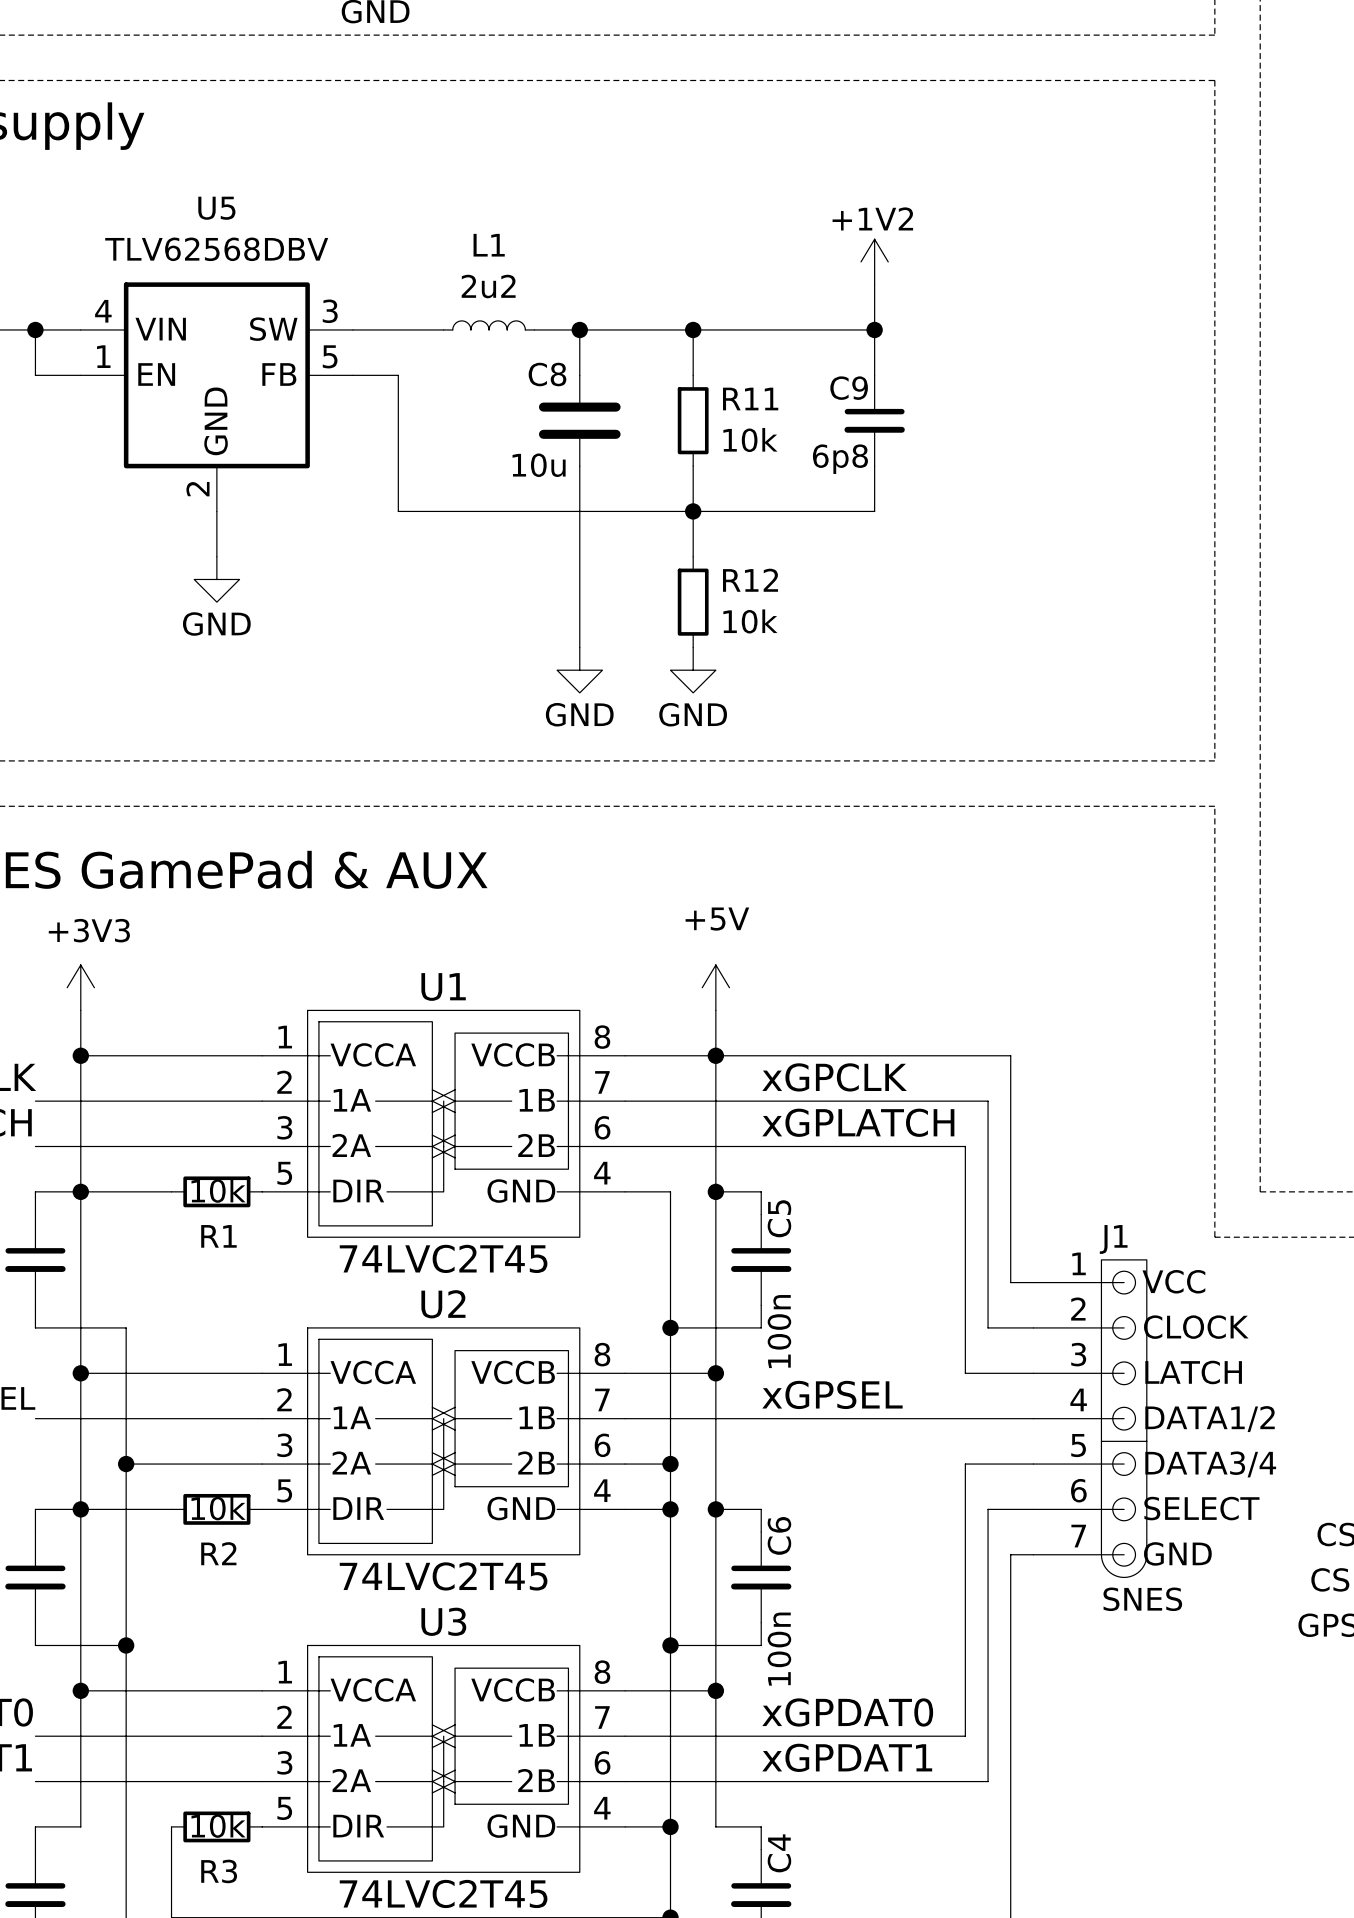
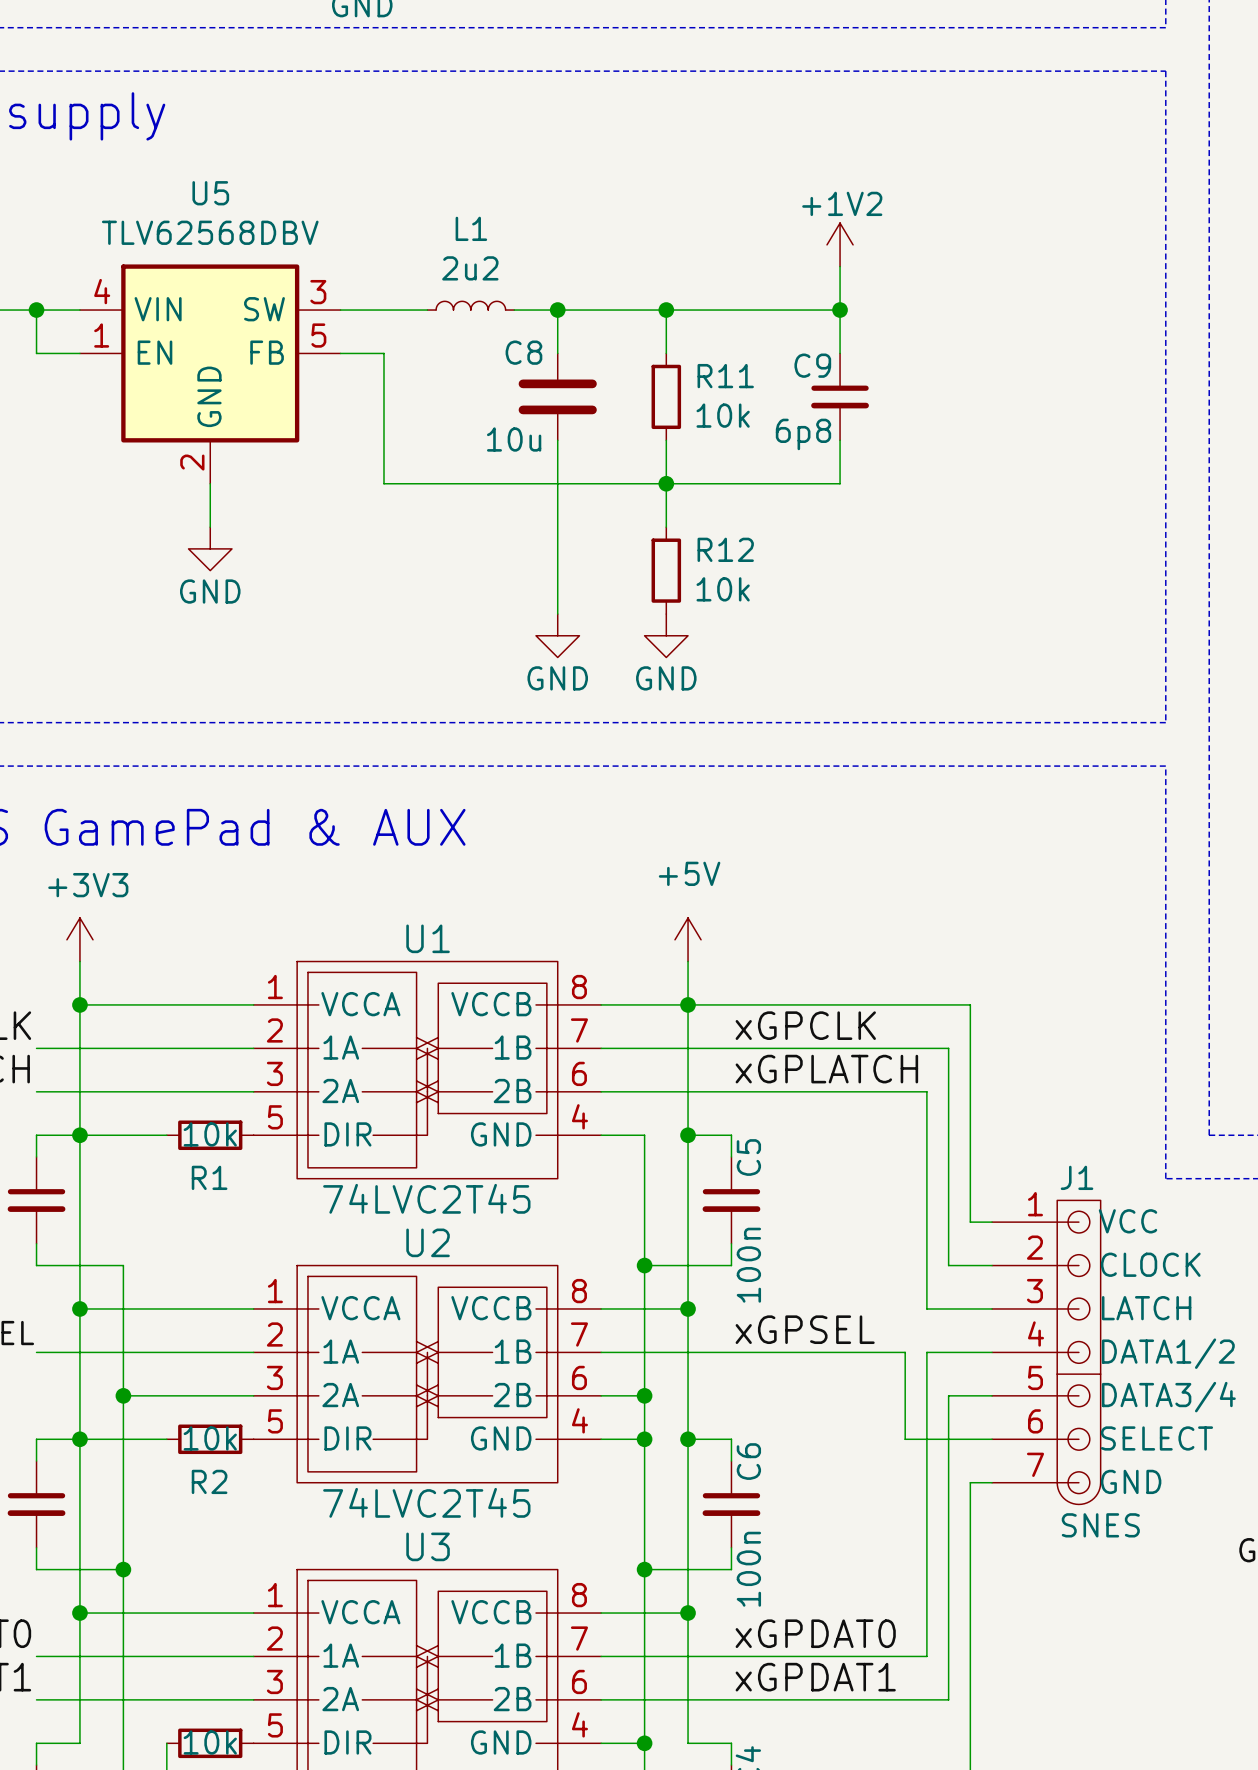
wire: (942, 1418) (965, 1418) -> (905, 1352) (905, 1439) (948, 1439) (948, 1395)
wire: (965, 1464) (988, 1464) -> (926, 1395) (926, 1352)

